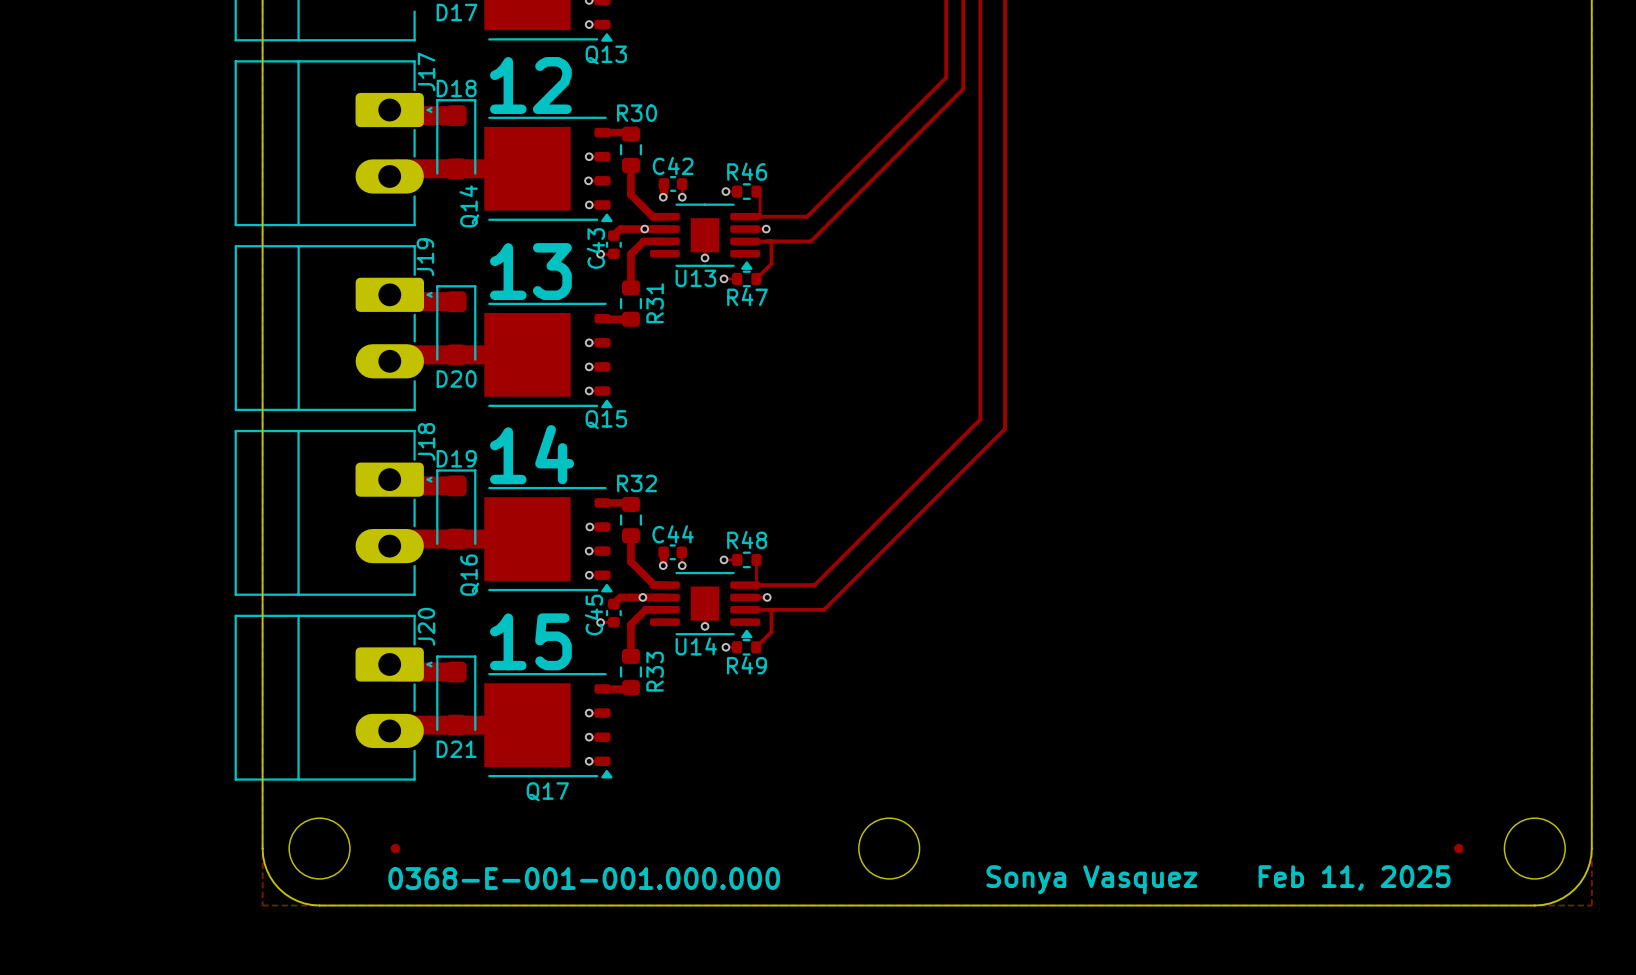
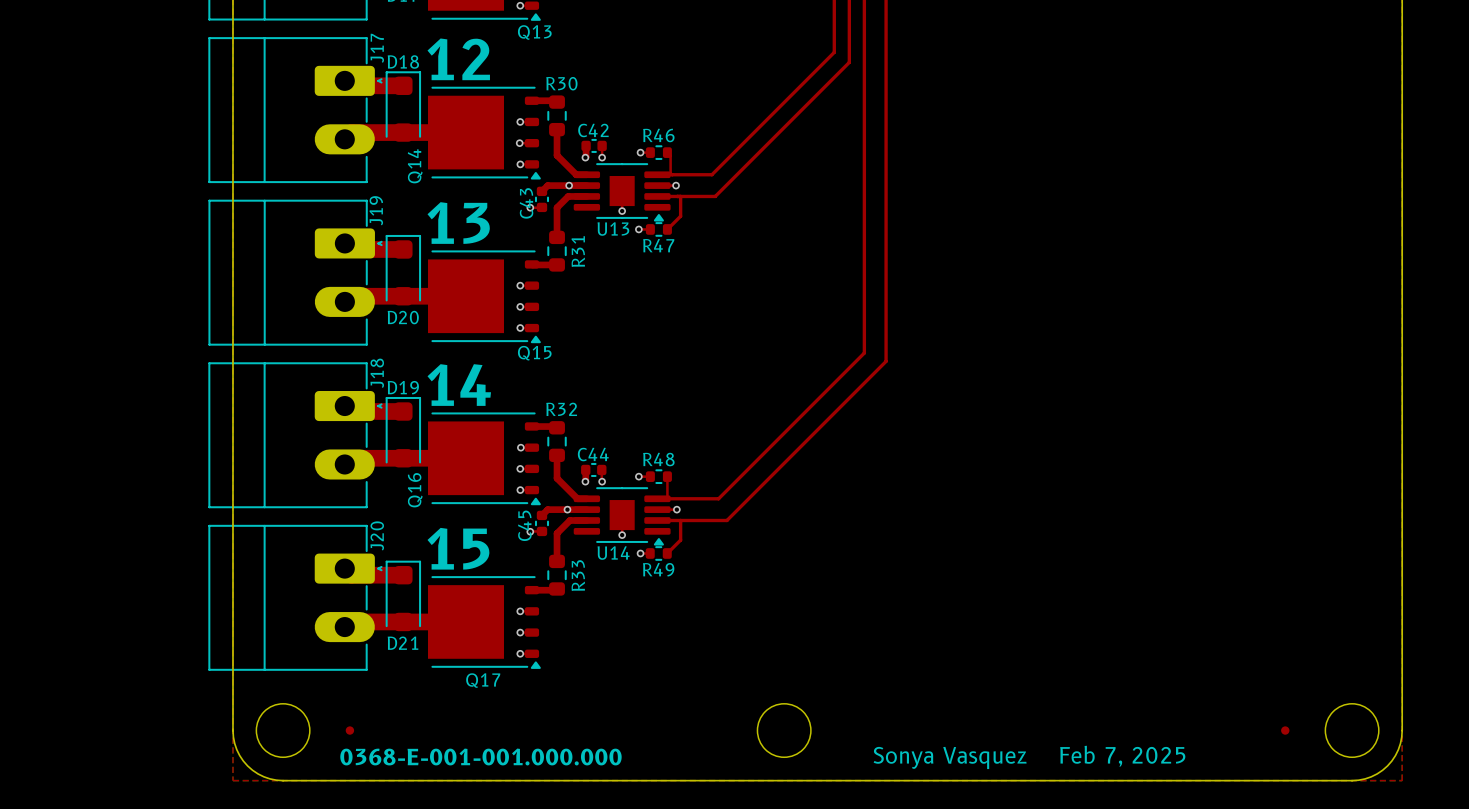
text: Sonya Vasquez Feb 11, 2025 (1218, 879) -> Sonya Vasquez Feb 7, 2025 (1029, 757)

